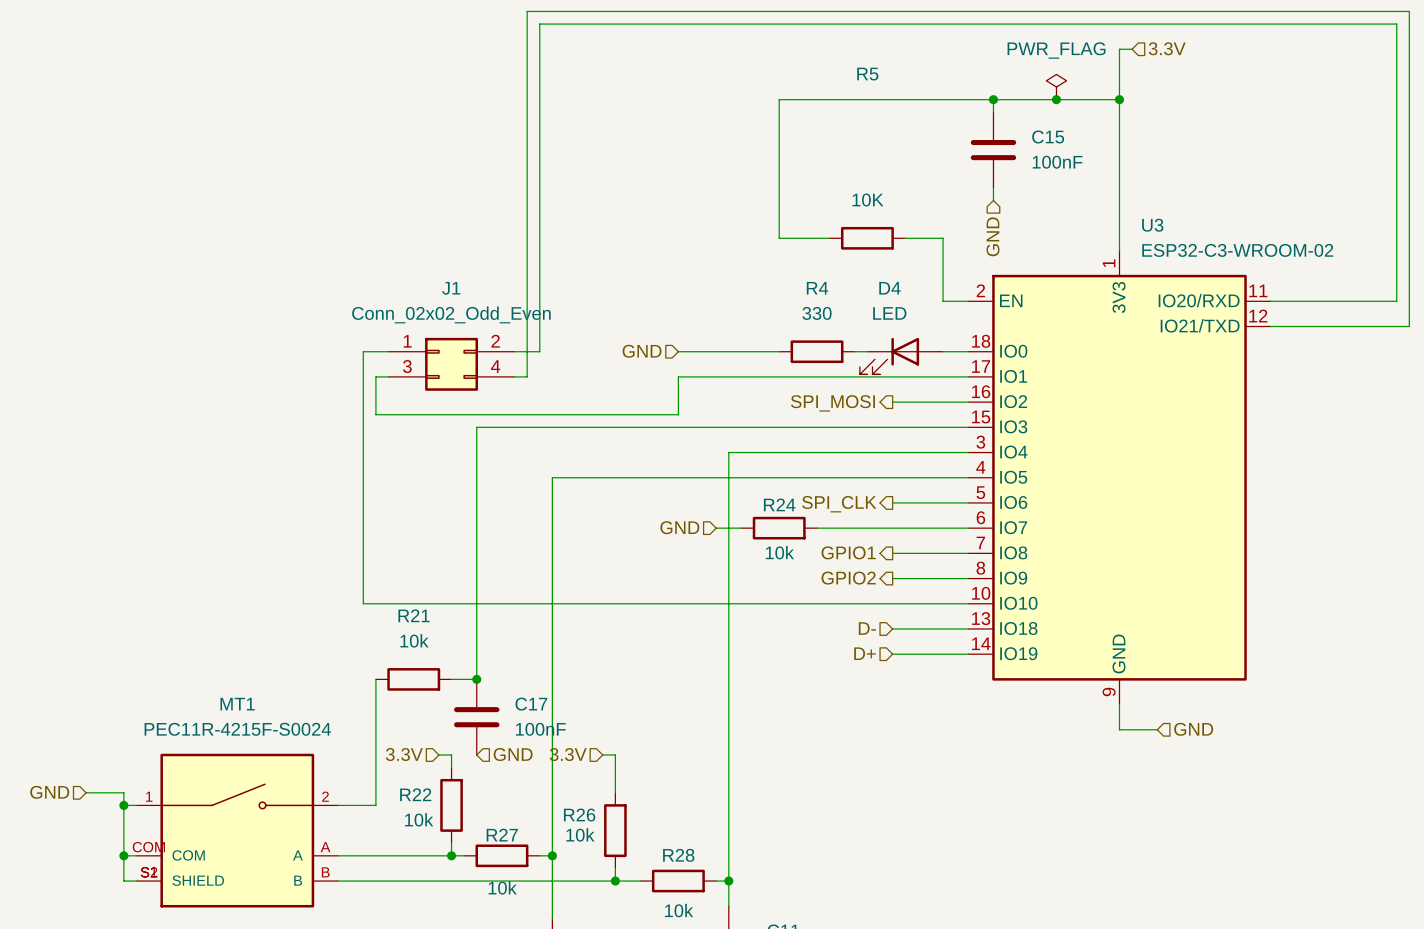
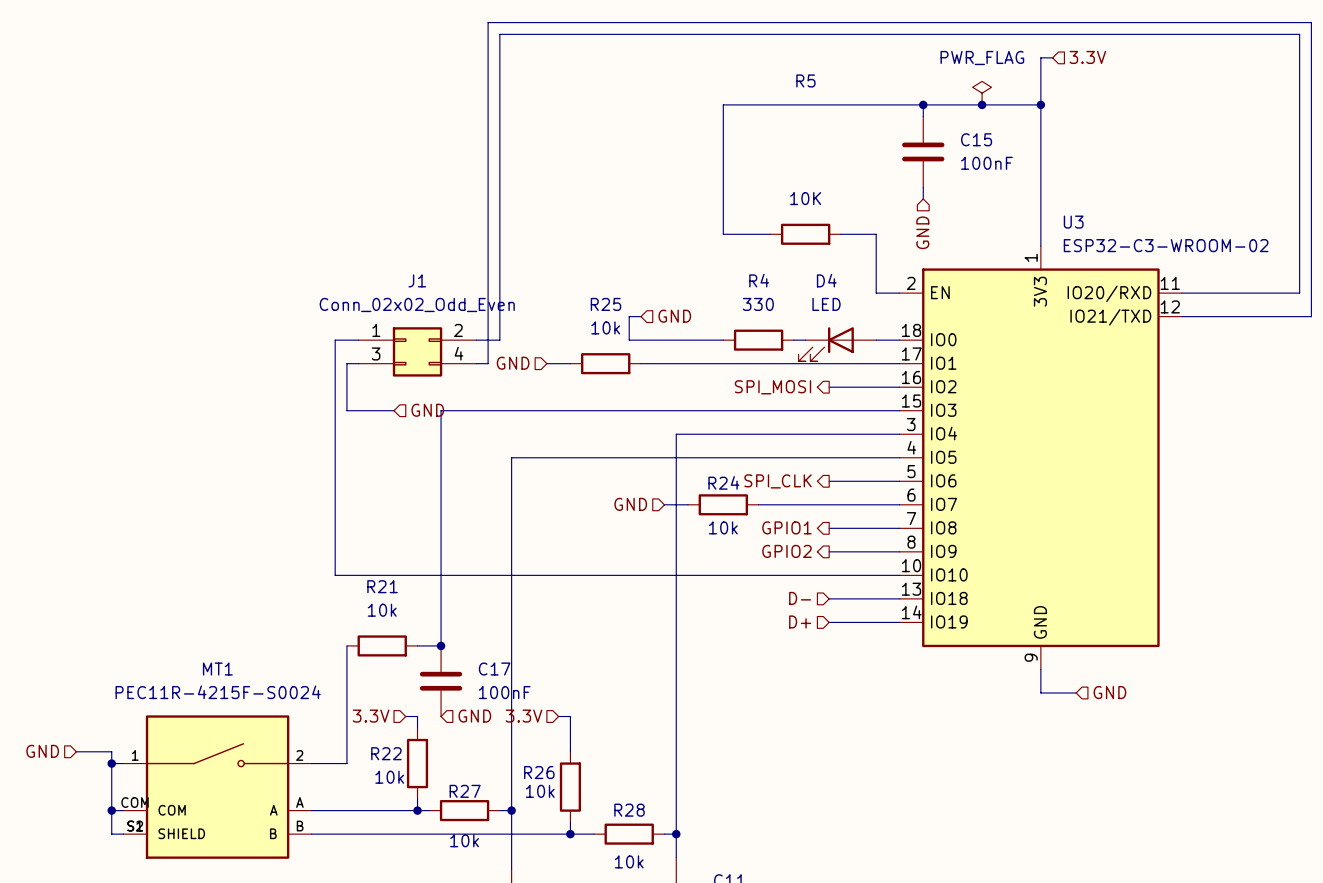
wire: none -> (640, 316) (629, 316) (629, 340)
hierarchical label: none -> GND (674, 316)
hierarchical label: GND (642, 351) -> none
hierarchical label: none -> GND (513, 363)
wire: none -> (546, 363) (570, 363)
R25: none -> 10k (605, 363)
wire: (691, 376) (678, 376) (678, 414) (375, 414) -> (394, 410) (346, 410) (346, 398)
hierarchical label: none -> GND (427, 410)

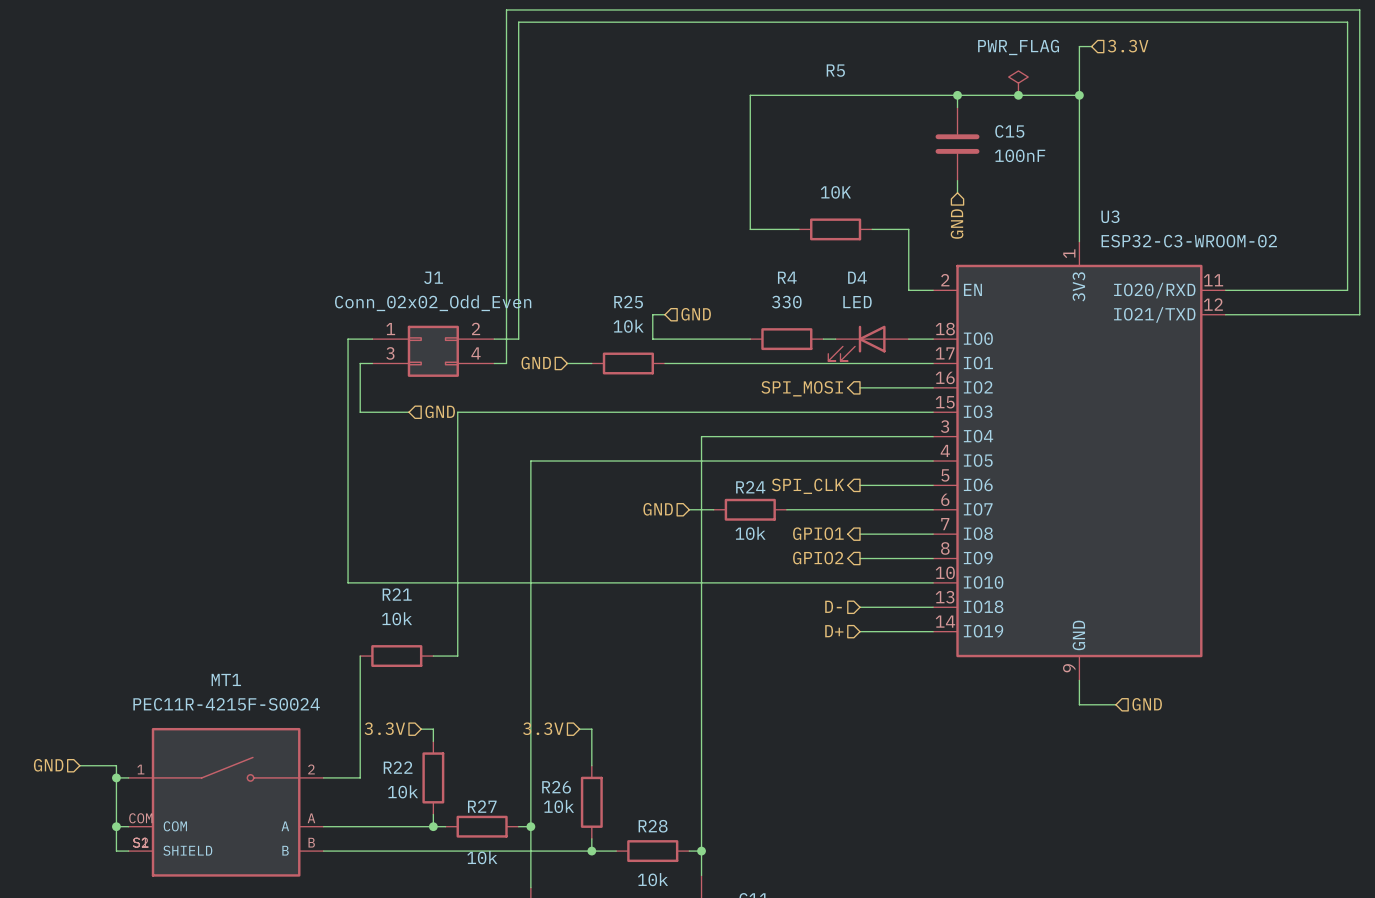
junction: (441, 645) -> none
C17: 100nF (441, 681) -> none
hierarchical label: GND (474, 716) -> none

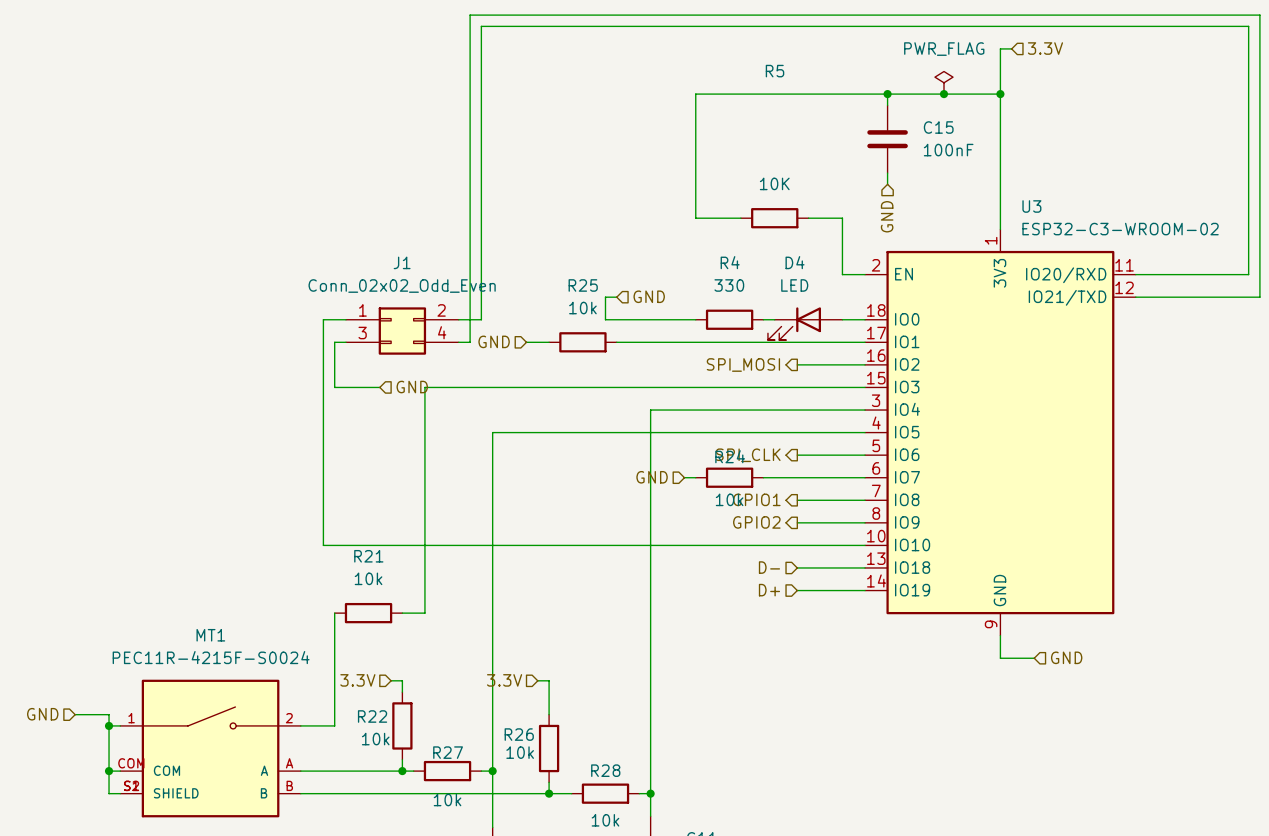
hierarchical label position: GND (658, 509) -> GND (652, 477)
wire: (689, 509) (713, 509) -> none
wire: none -> (684, 477) (695, 477)
R24 position: (750, 509) -> (729, 477)
wire: (786, 509) (823, 509) -> none

